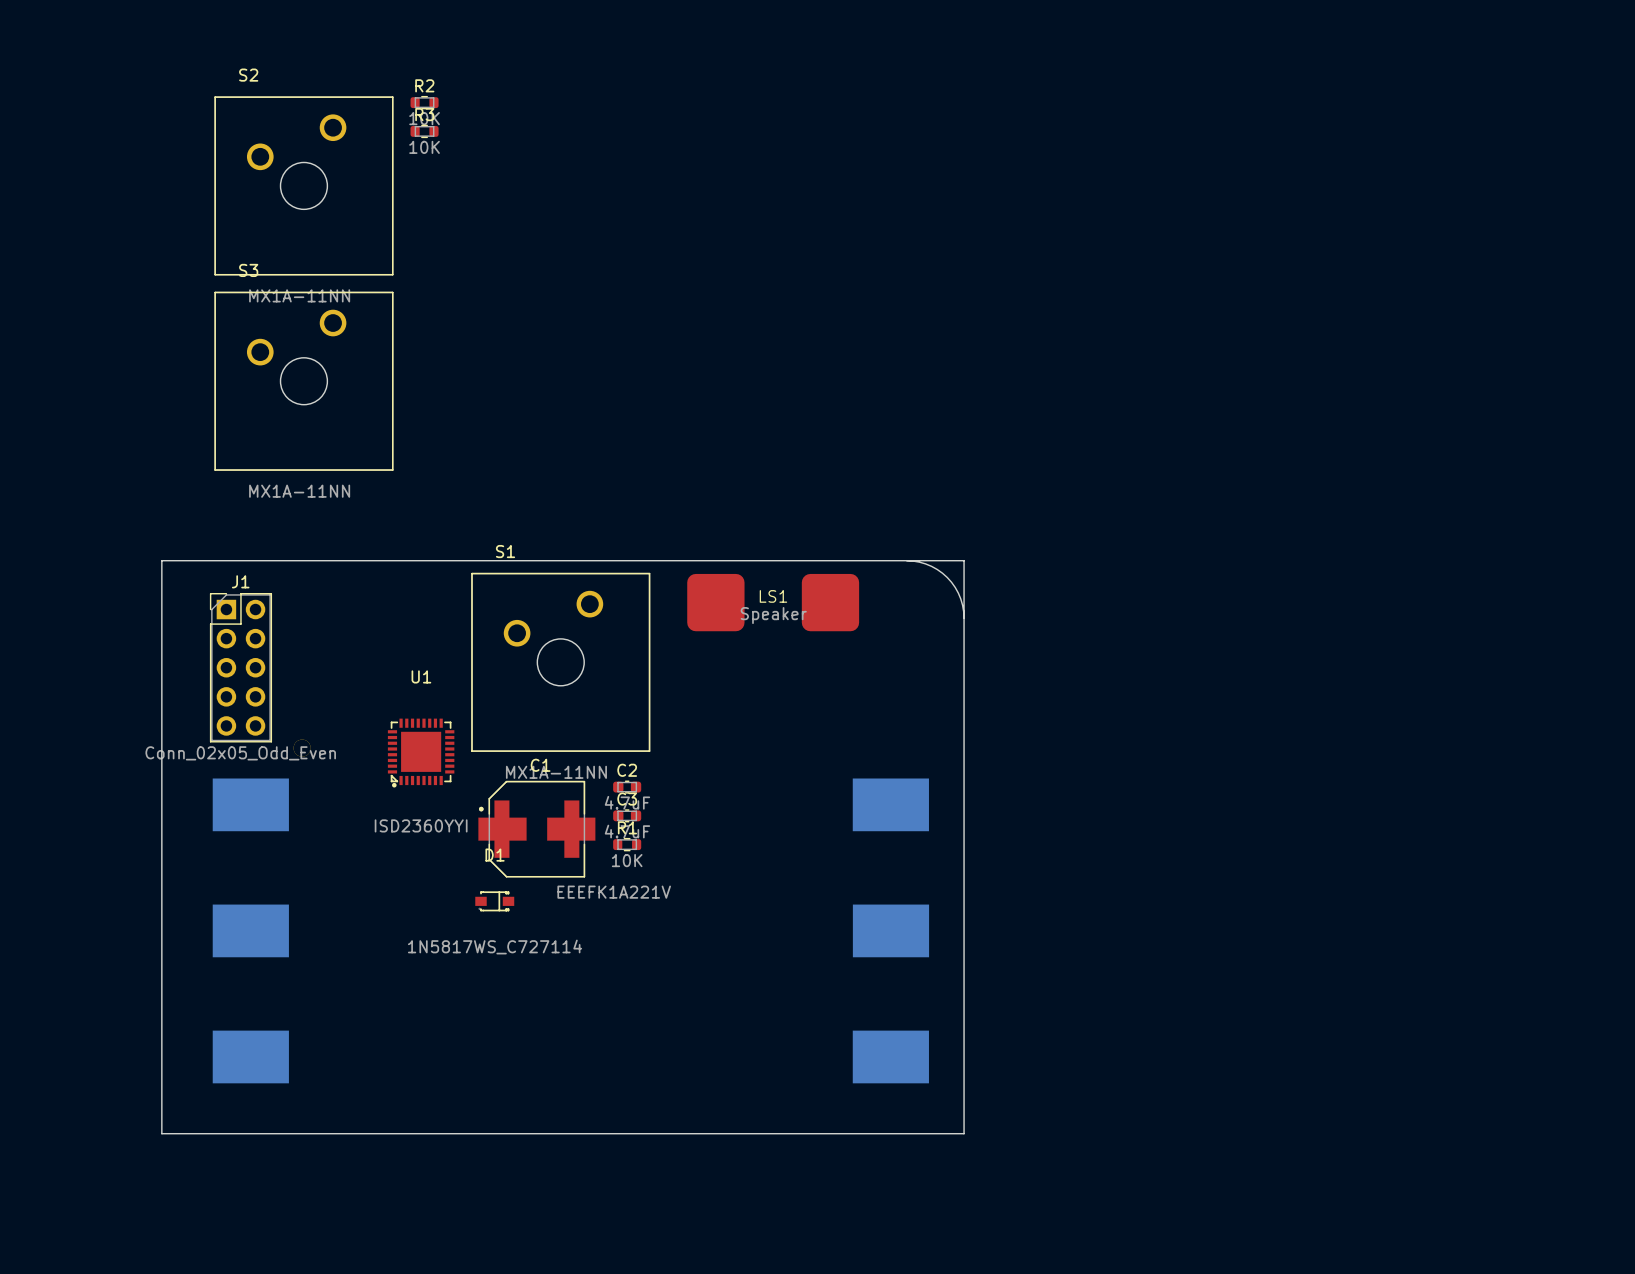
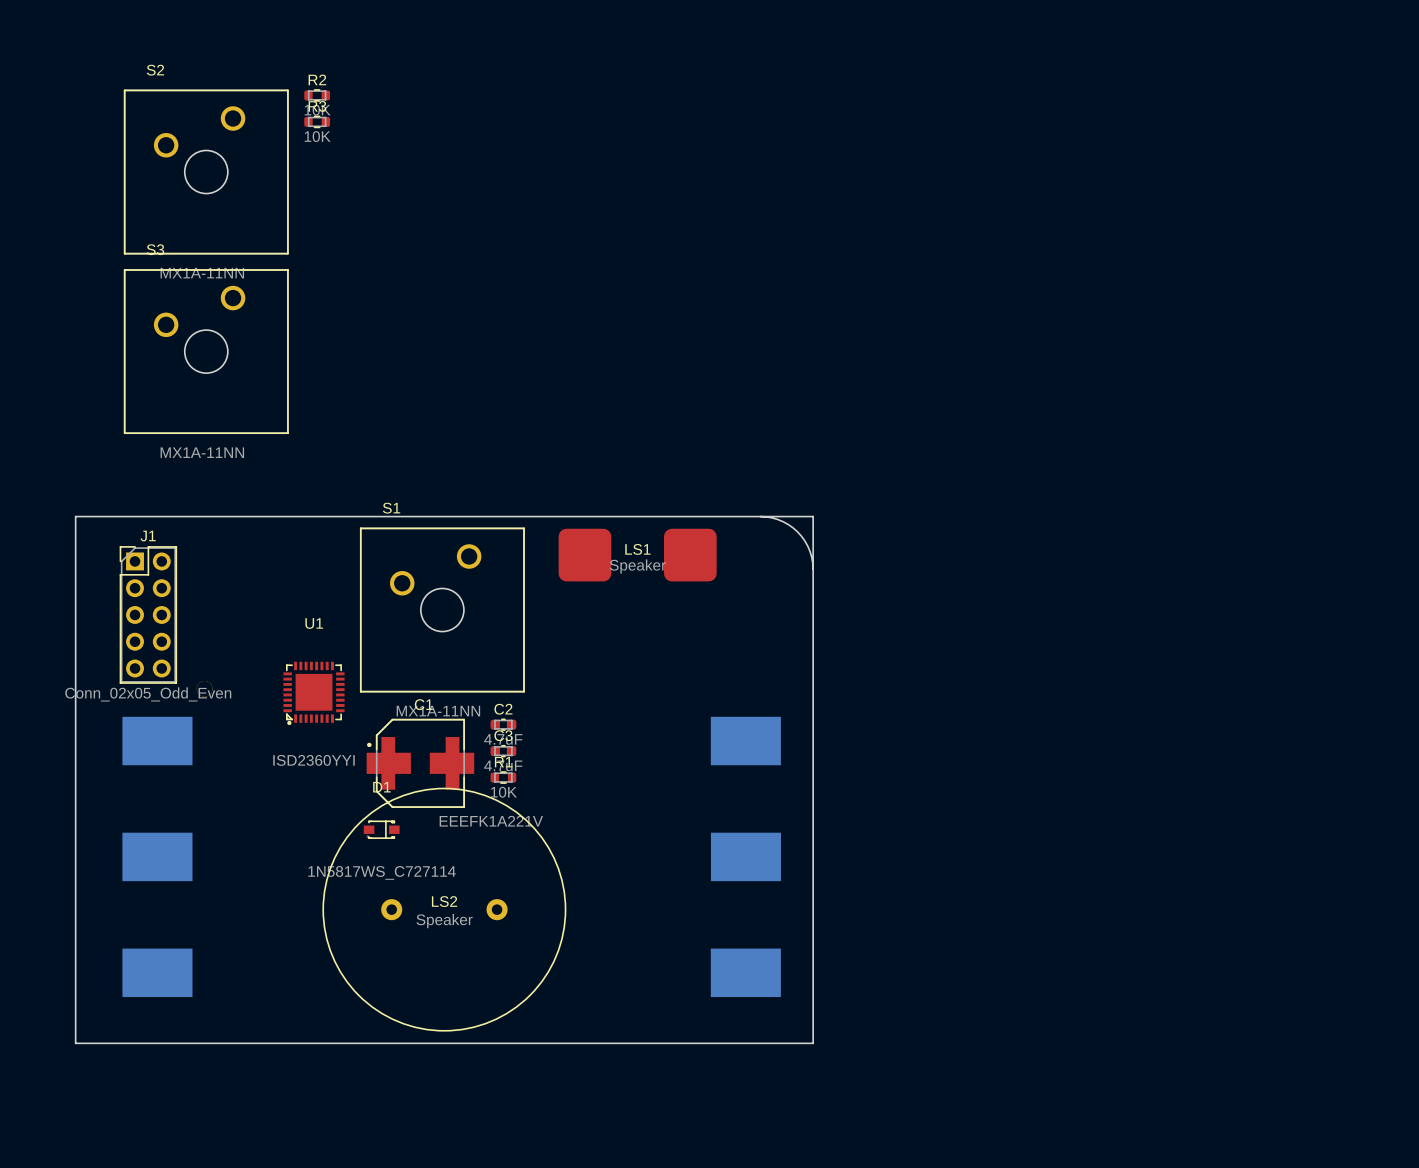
LS2: none -> Speaker (444, 909)

